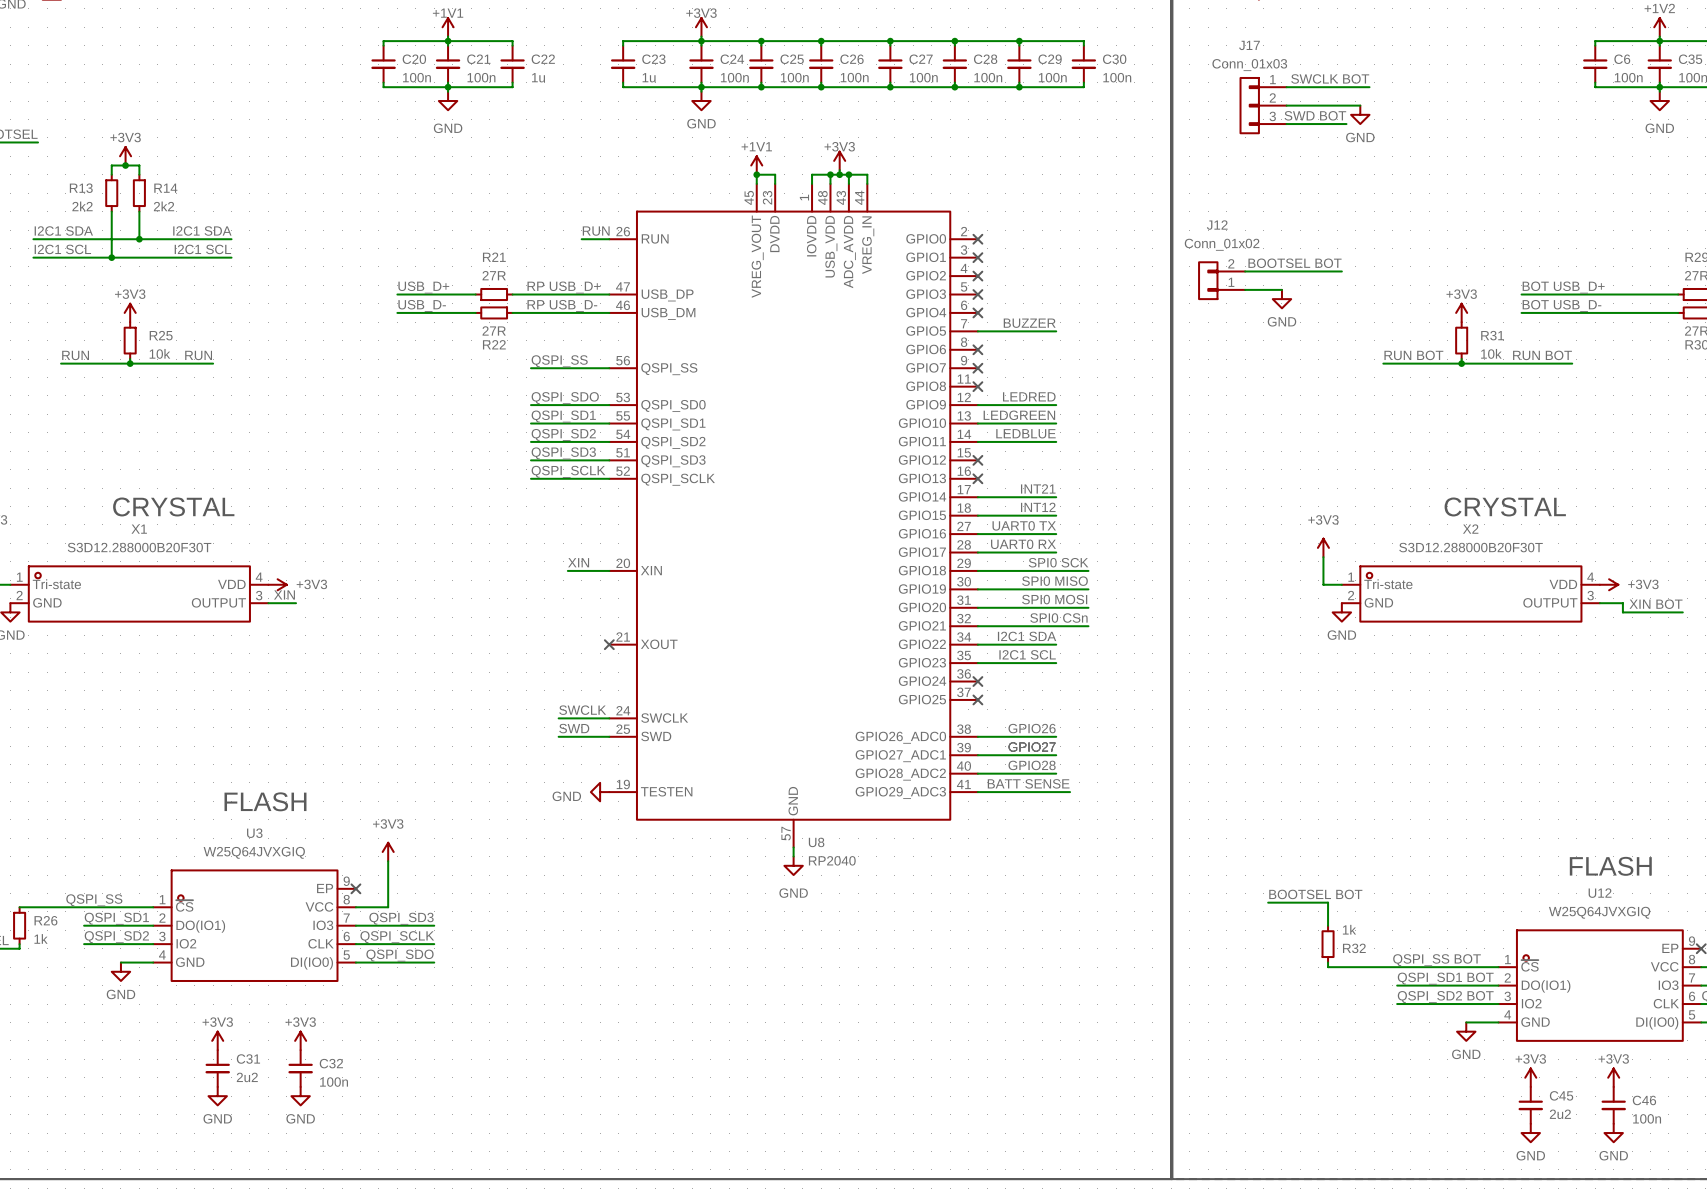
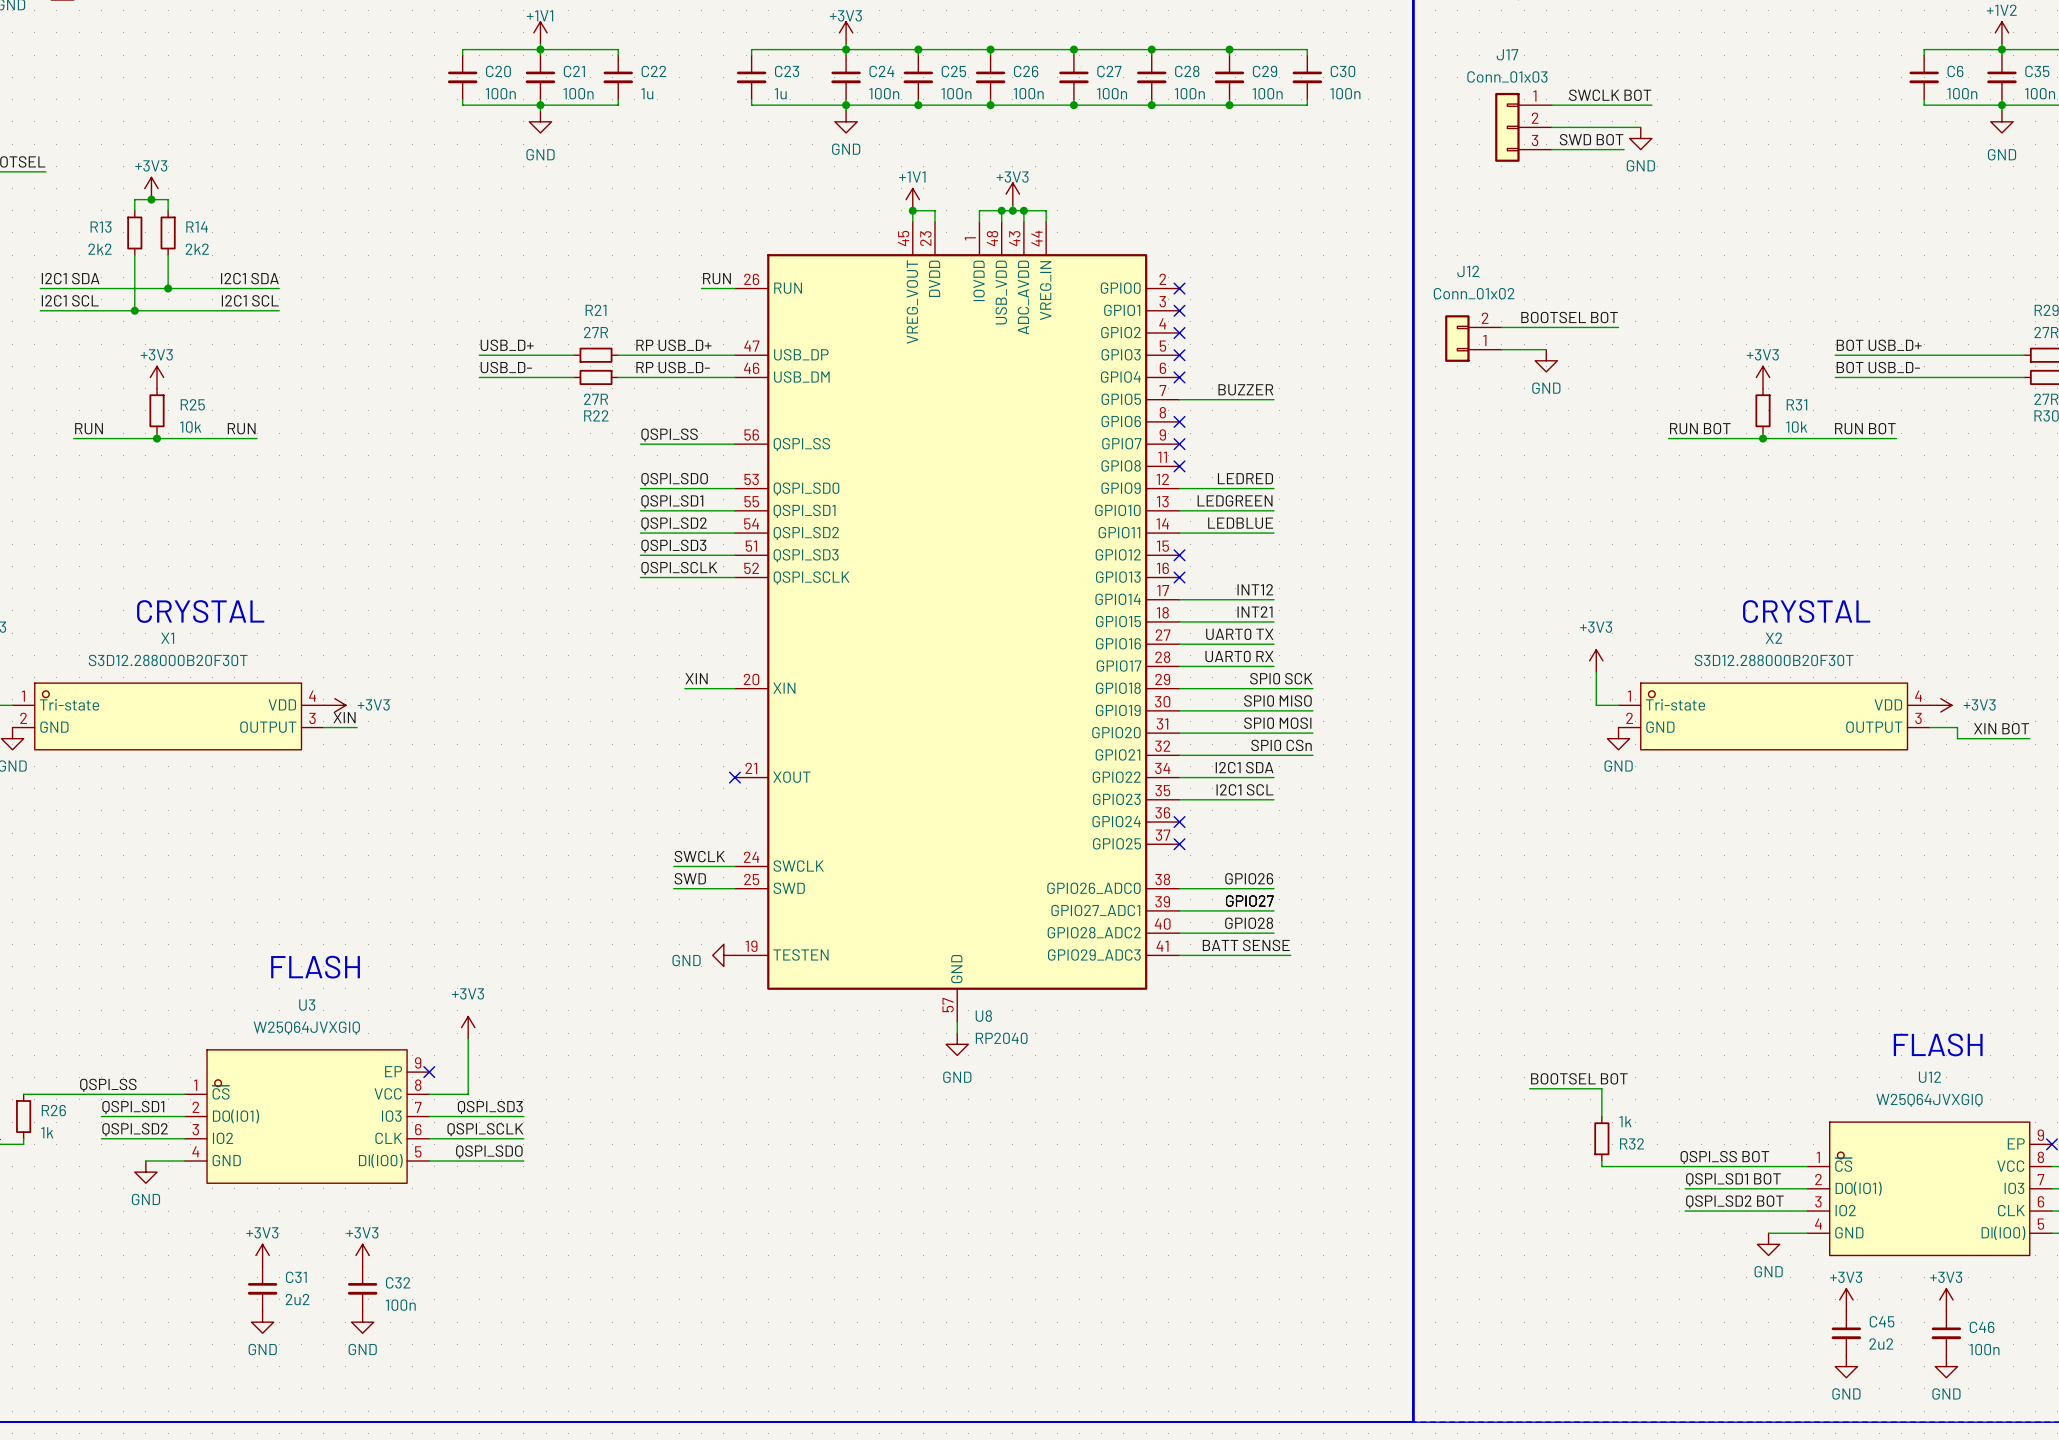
label: INT21 (1038, 488) -> INT12 (1255, 589)
label: INT12 (1038, 507) -> INT21 (1255, 611)

